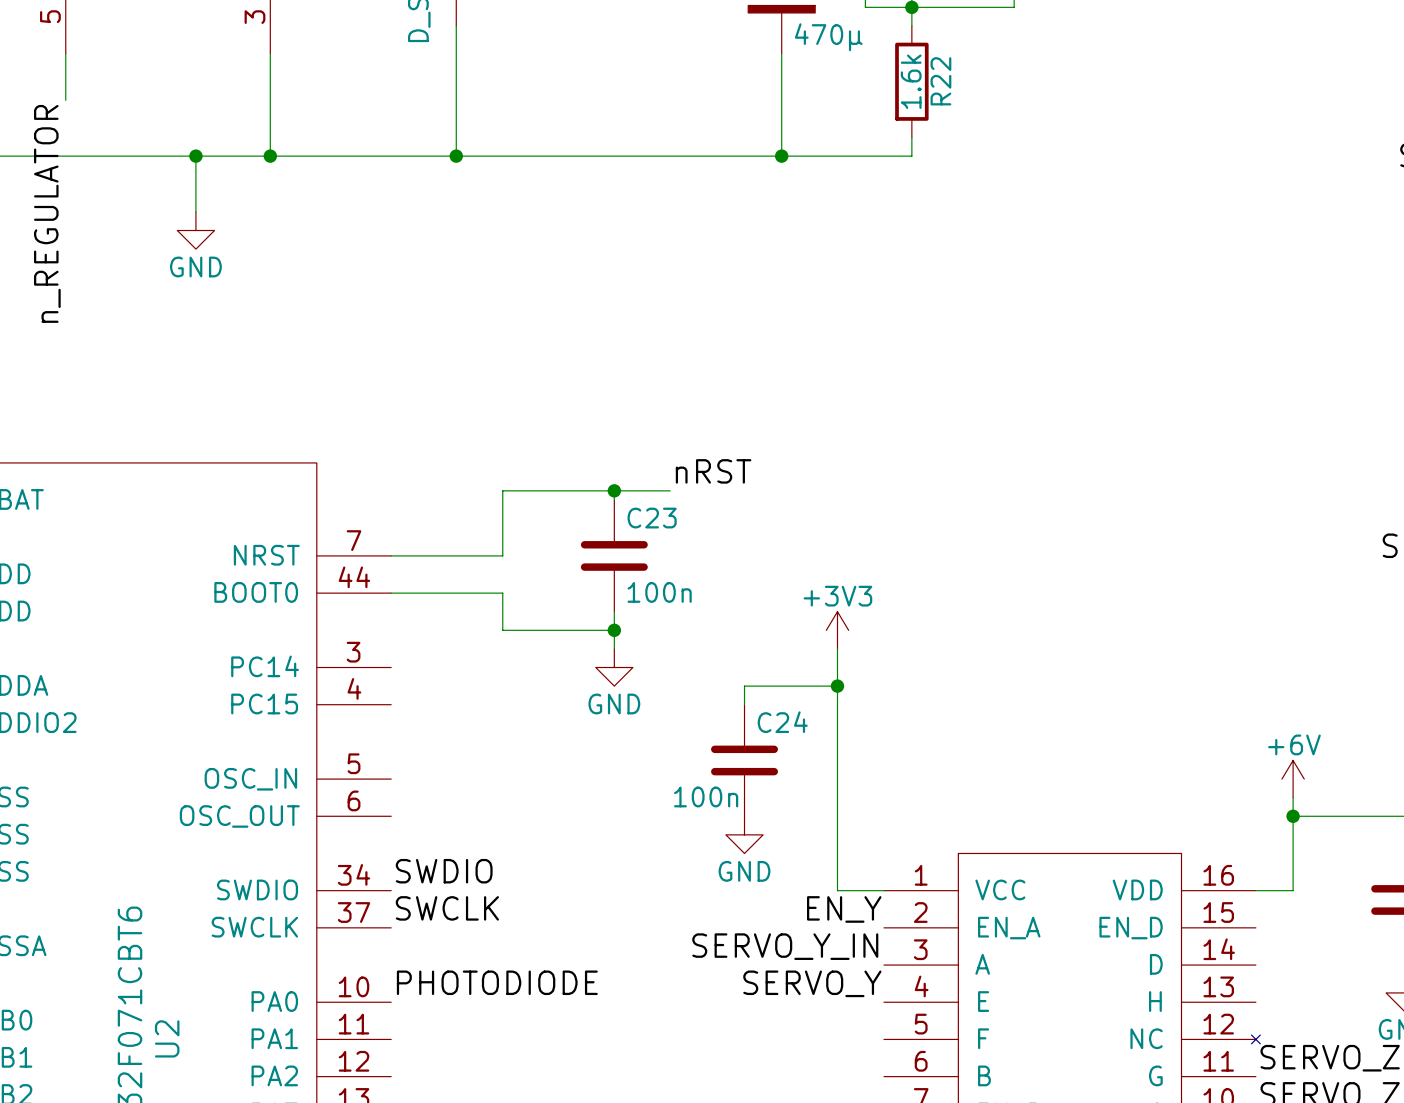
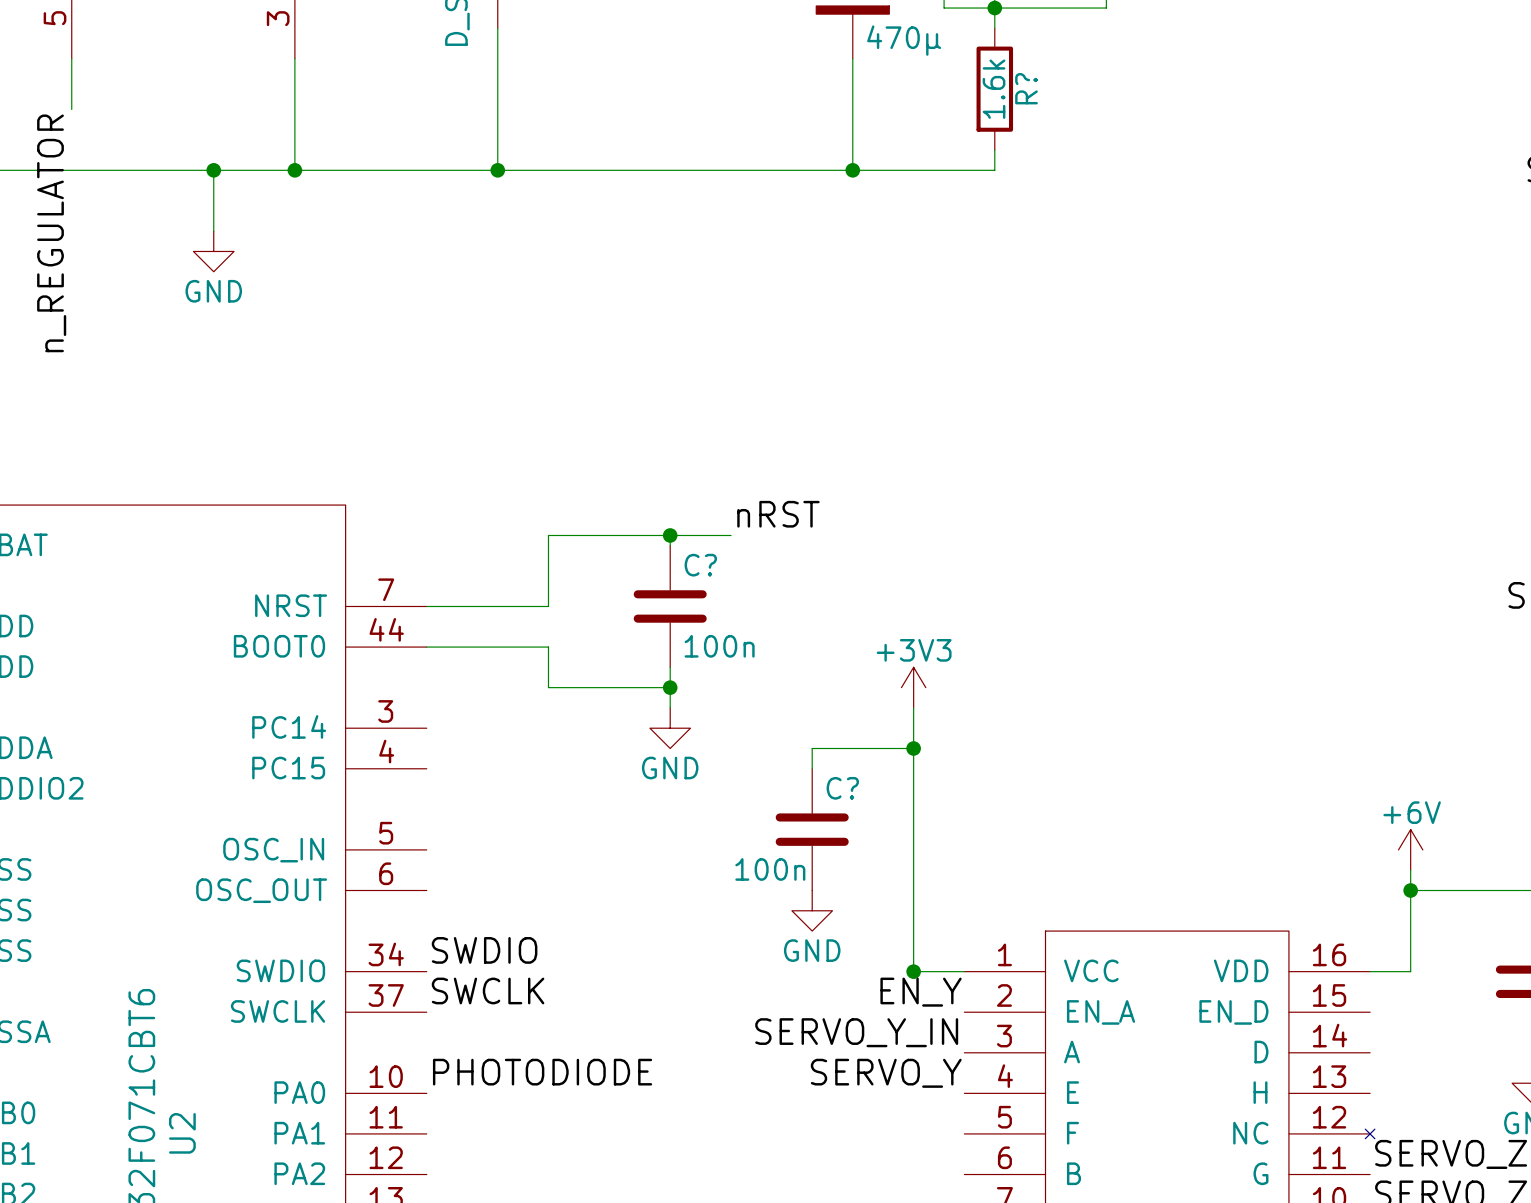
R22 name: R22 (940, 81) -> R? (1026, 88)
C23 name: C23 (652, 518) -> C? (700, 565)
C24 name: C24 (782, 722) -> C? (842, 788)
junction: none -> (913, 971)

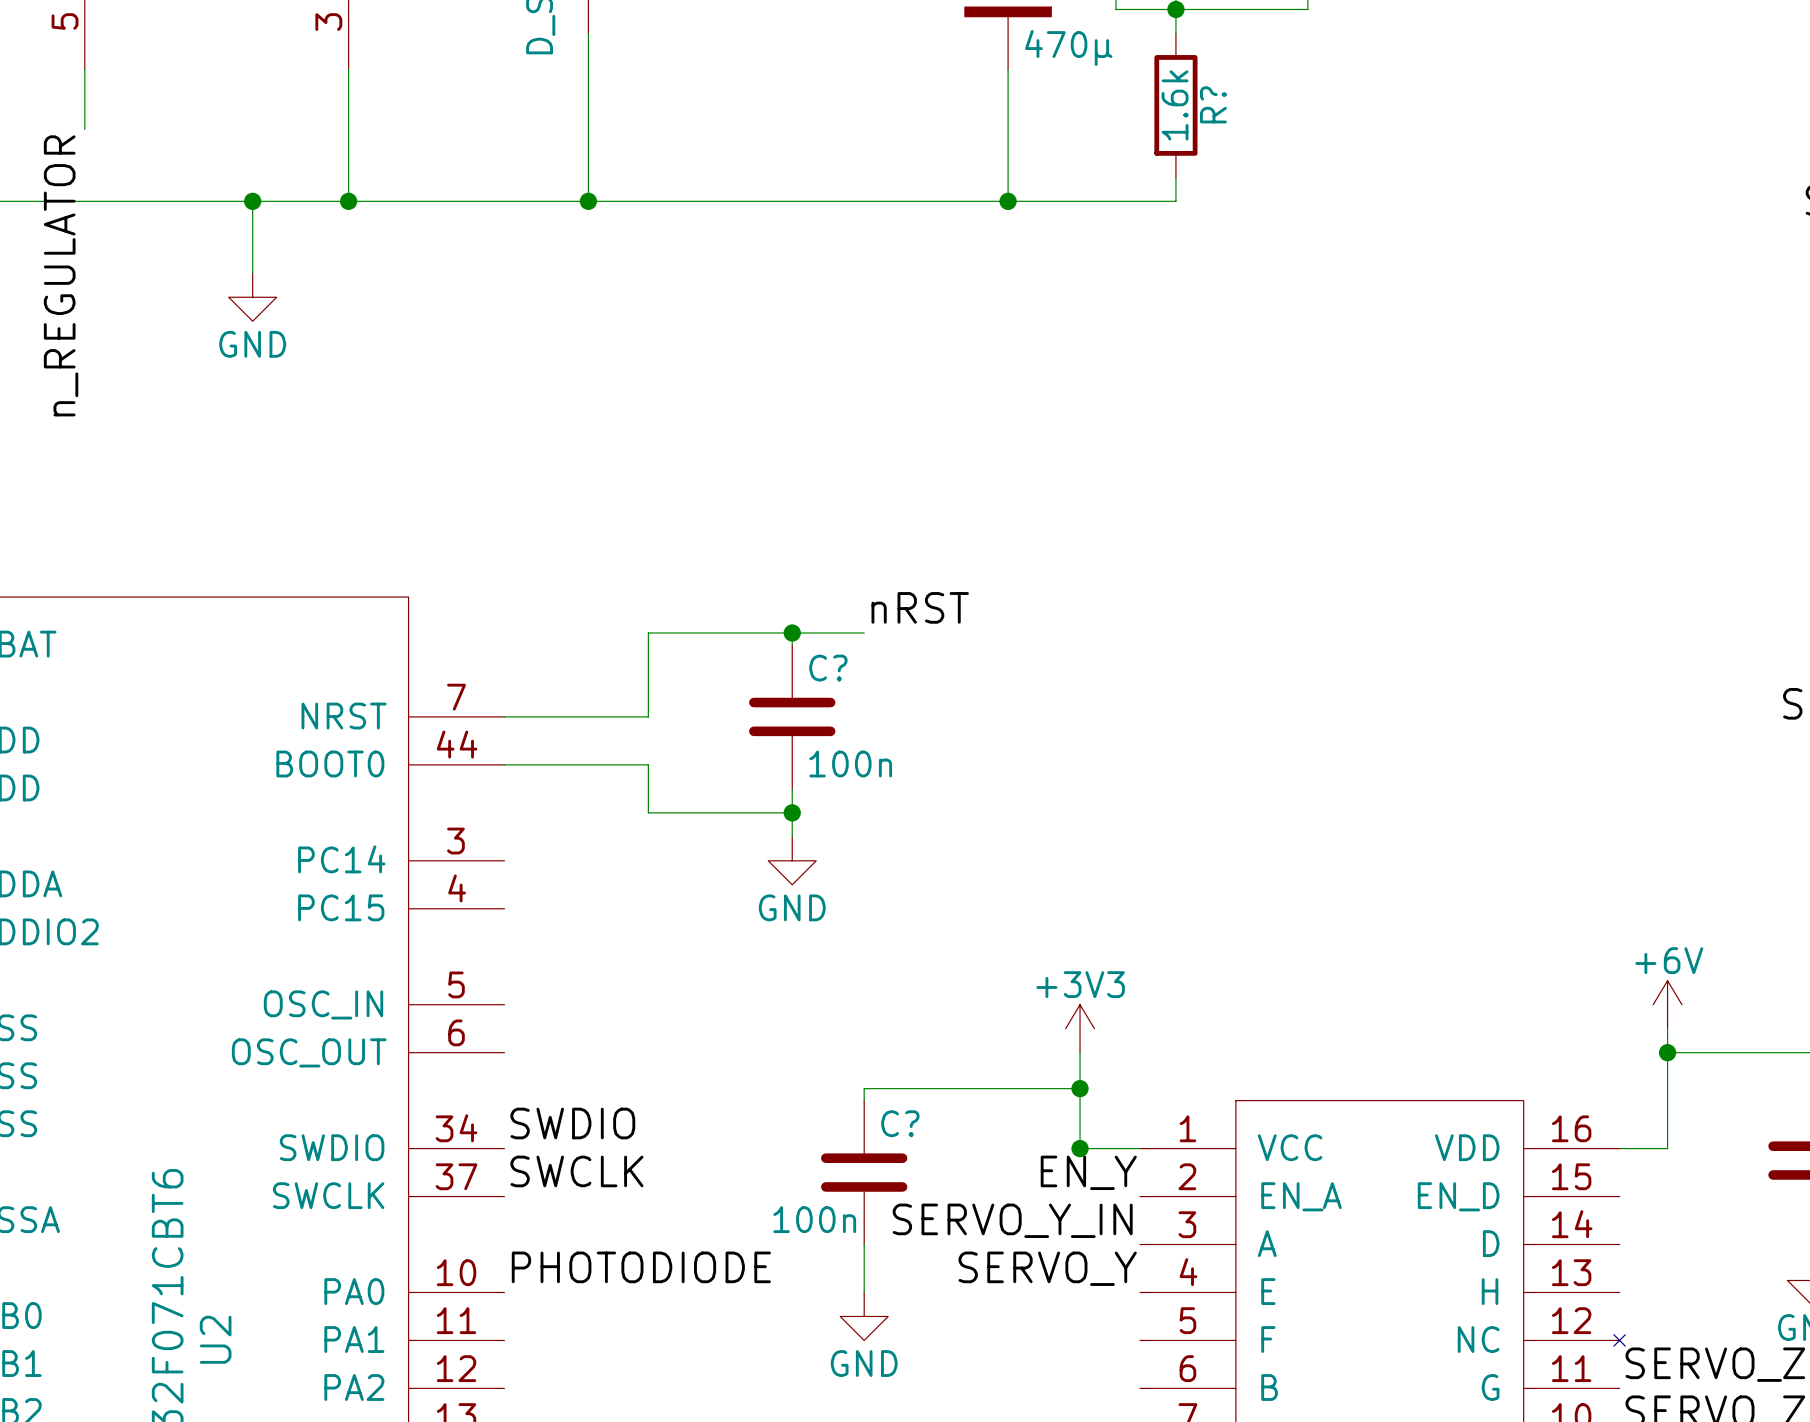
power symbol position: +3V3 (913, 687) -> +3V3 (1080, 1028)
wire: (913, 707) (913, 890) -> none
wire: (913, 748) (812, 748) (812, 768) -> none
junction: (913, 748) -> none
C? position: (812, 829) -> (864, 1172)
power symbol position: GND (812, 910) -> GND (864, 1316)
wire: none -> (1080, 1088) (864, 1088) (864, 1100)
junction: none -> (1080, 1088)
wire: none -> (864, 1244) (864, 1292)

